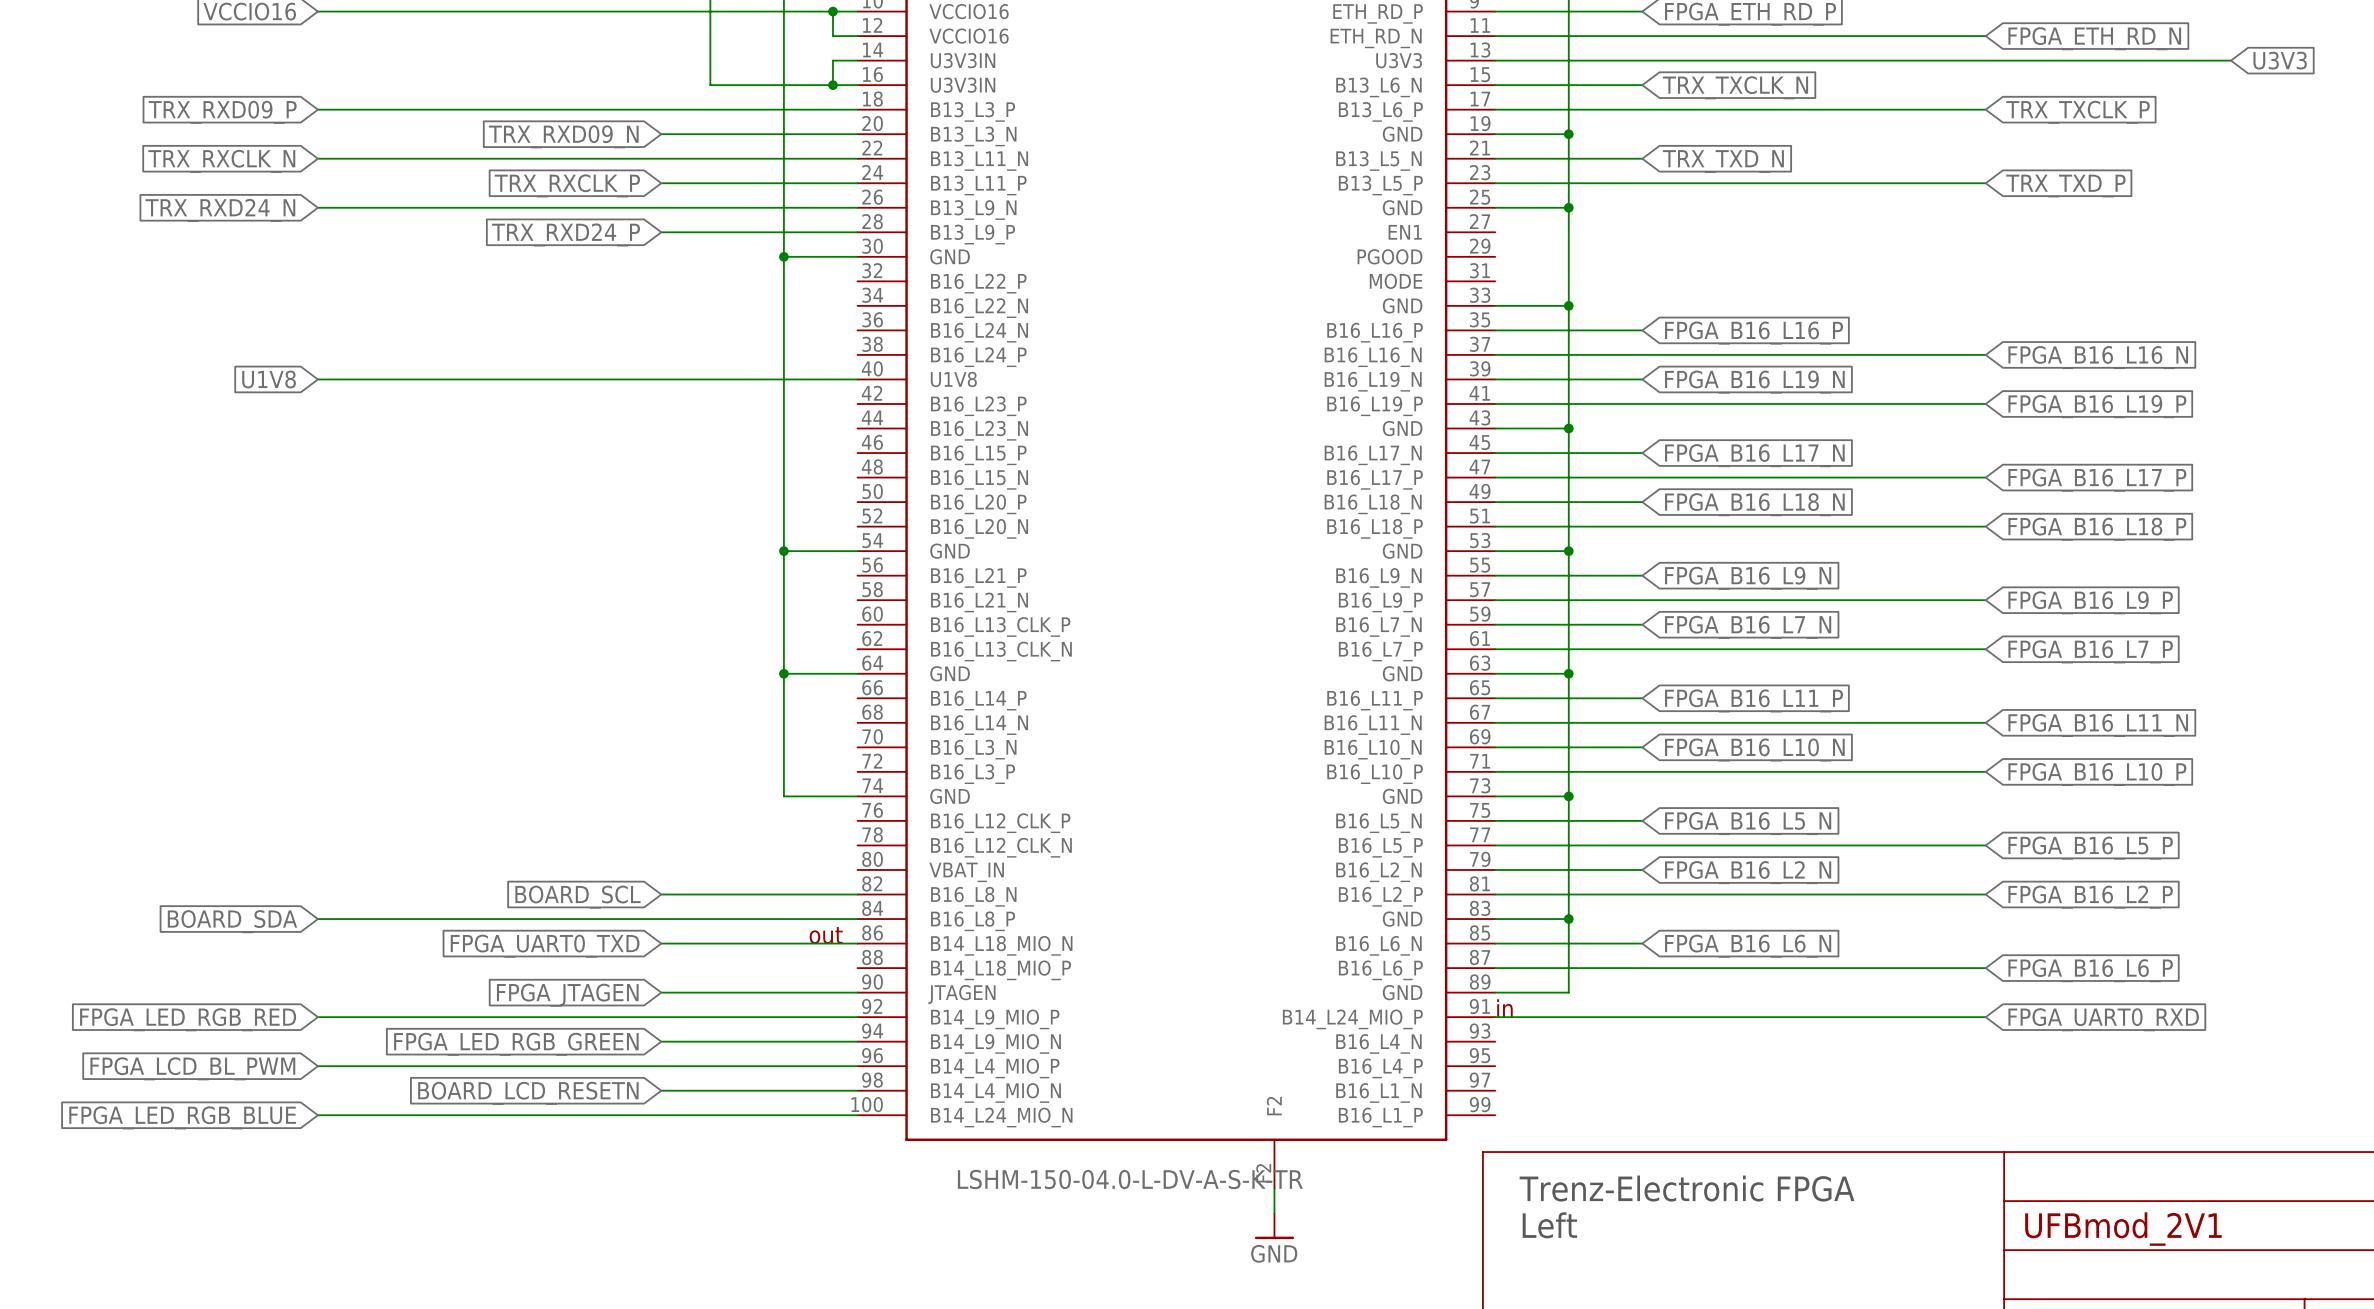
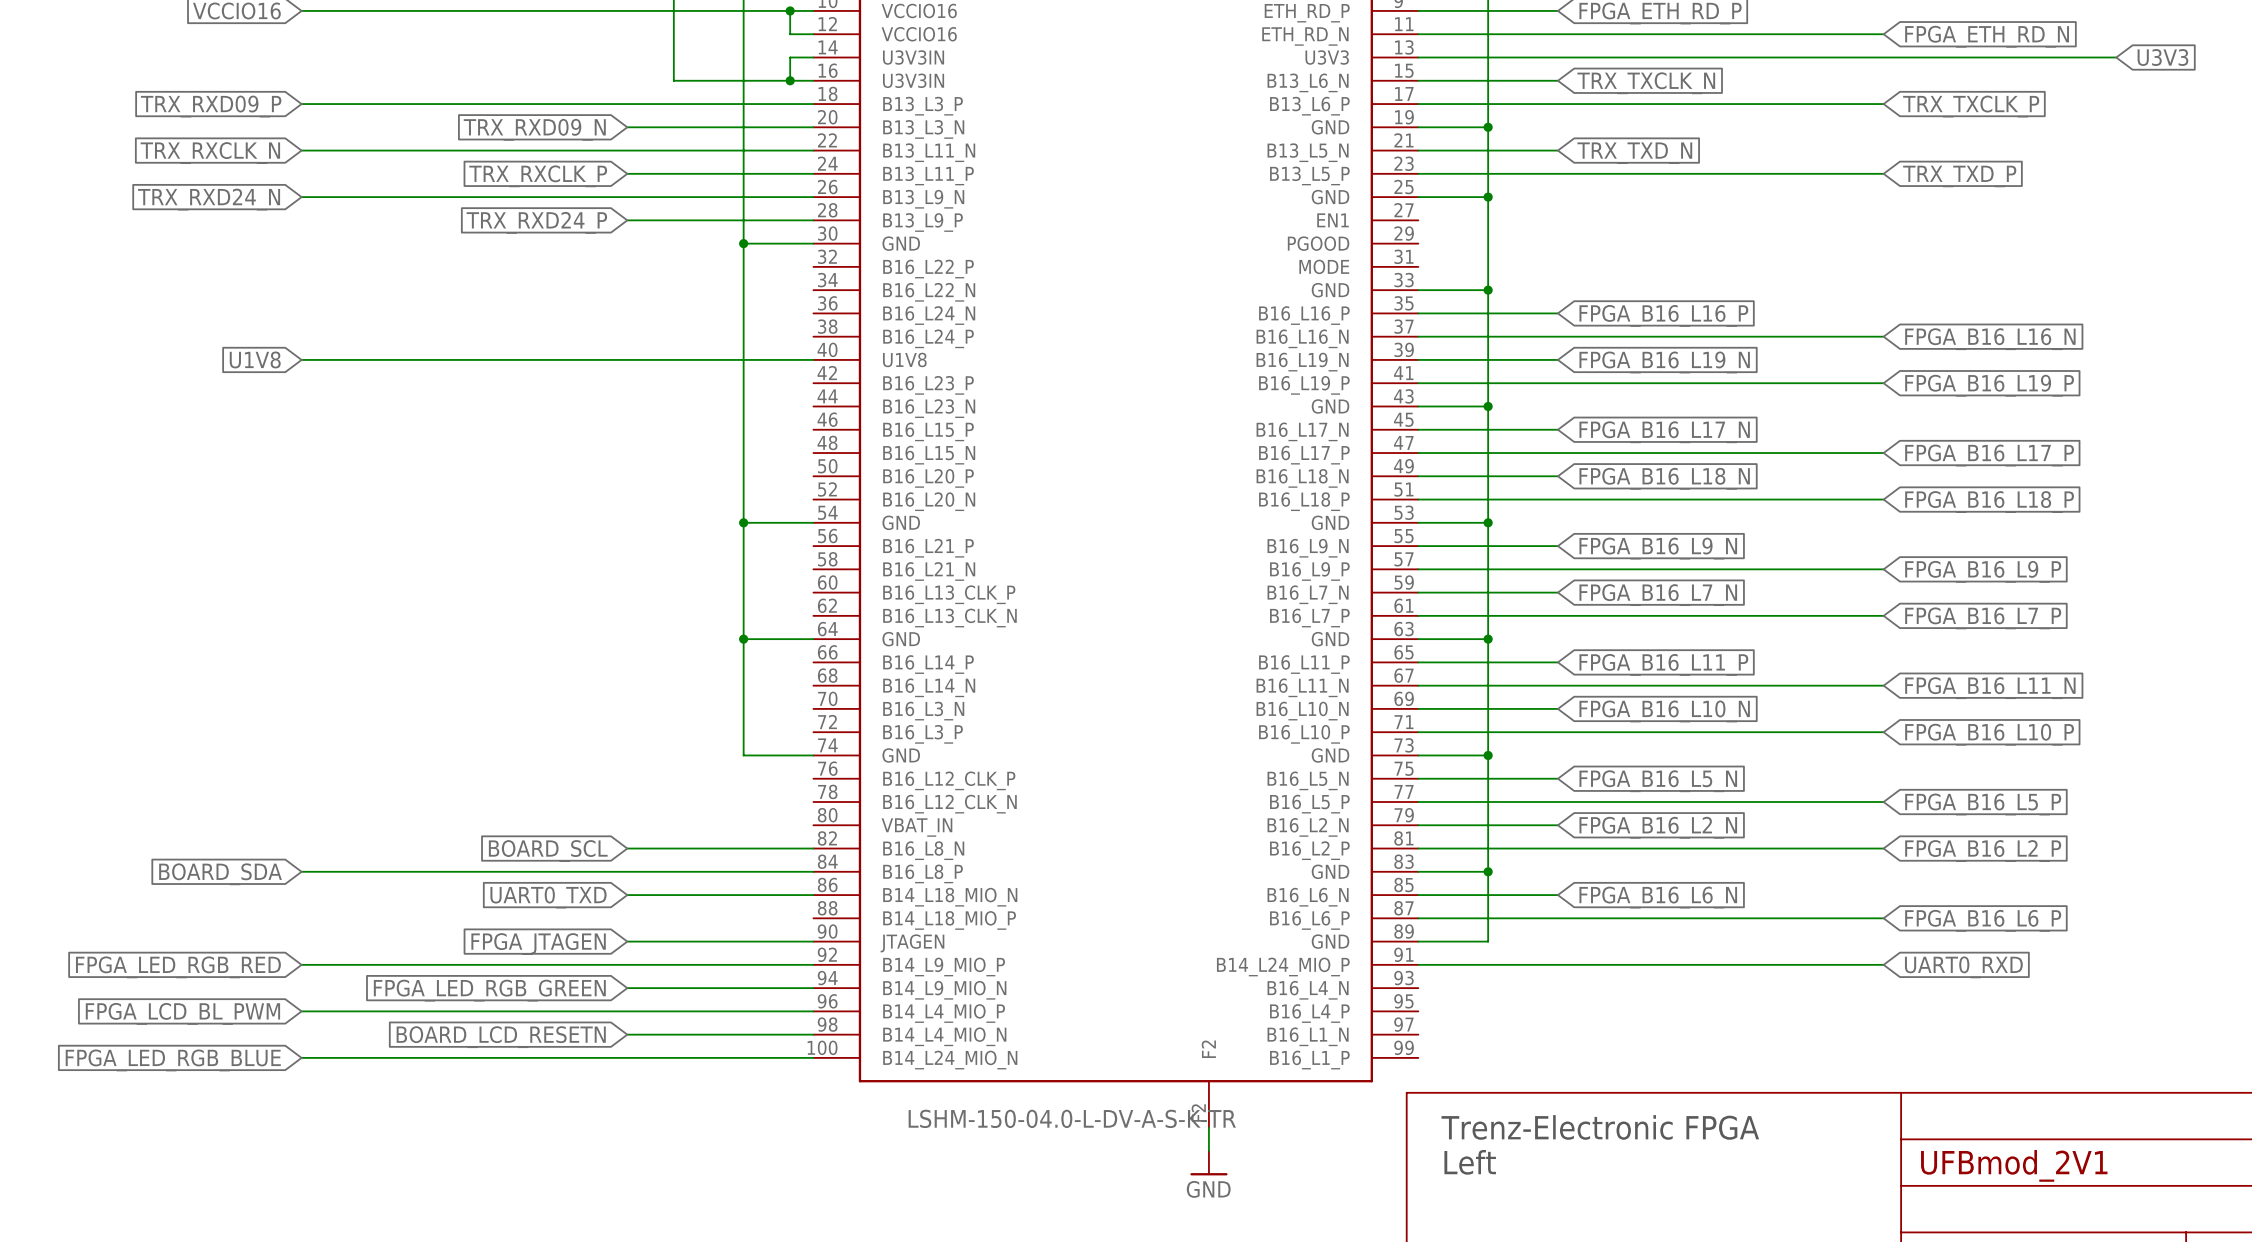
text: out (826, 935) -> none
global label: FPGA_UART0_TXD (545, 946) -> UART0_TXD (548, 897)
text: in (1504, 1008) -> none
global label: FPGA_UART0_RXD (2103, 1019) -> UART0_RXD (1963, 967)

